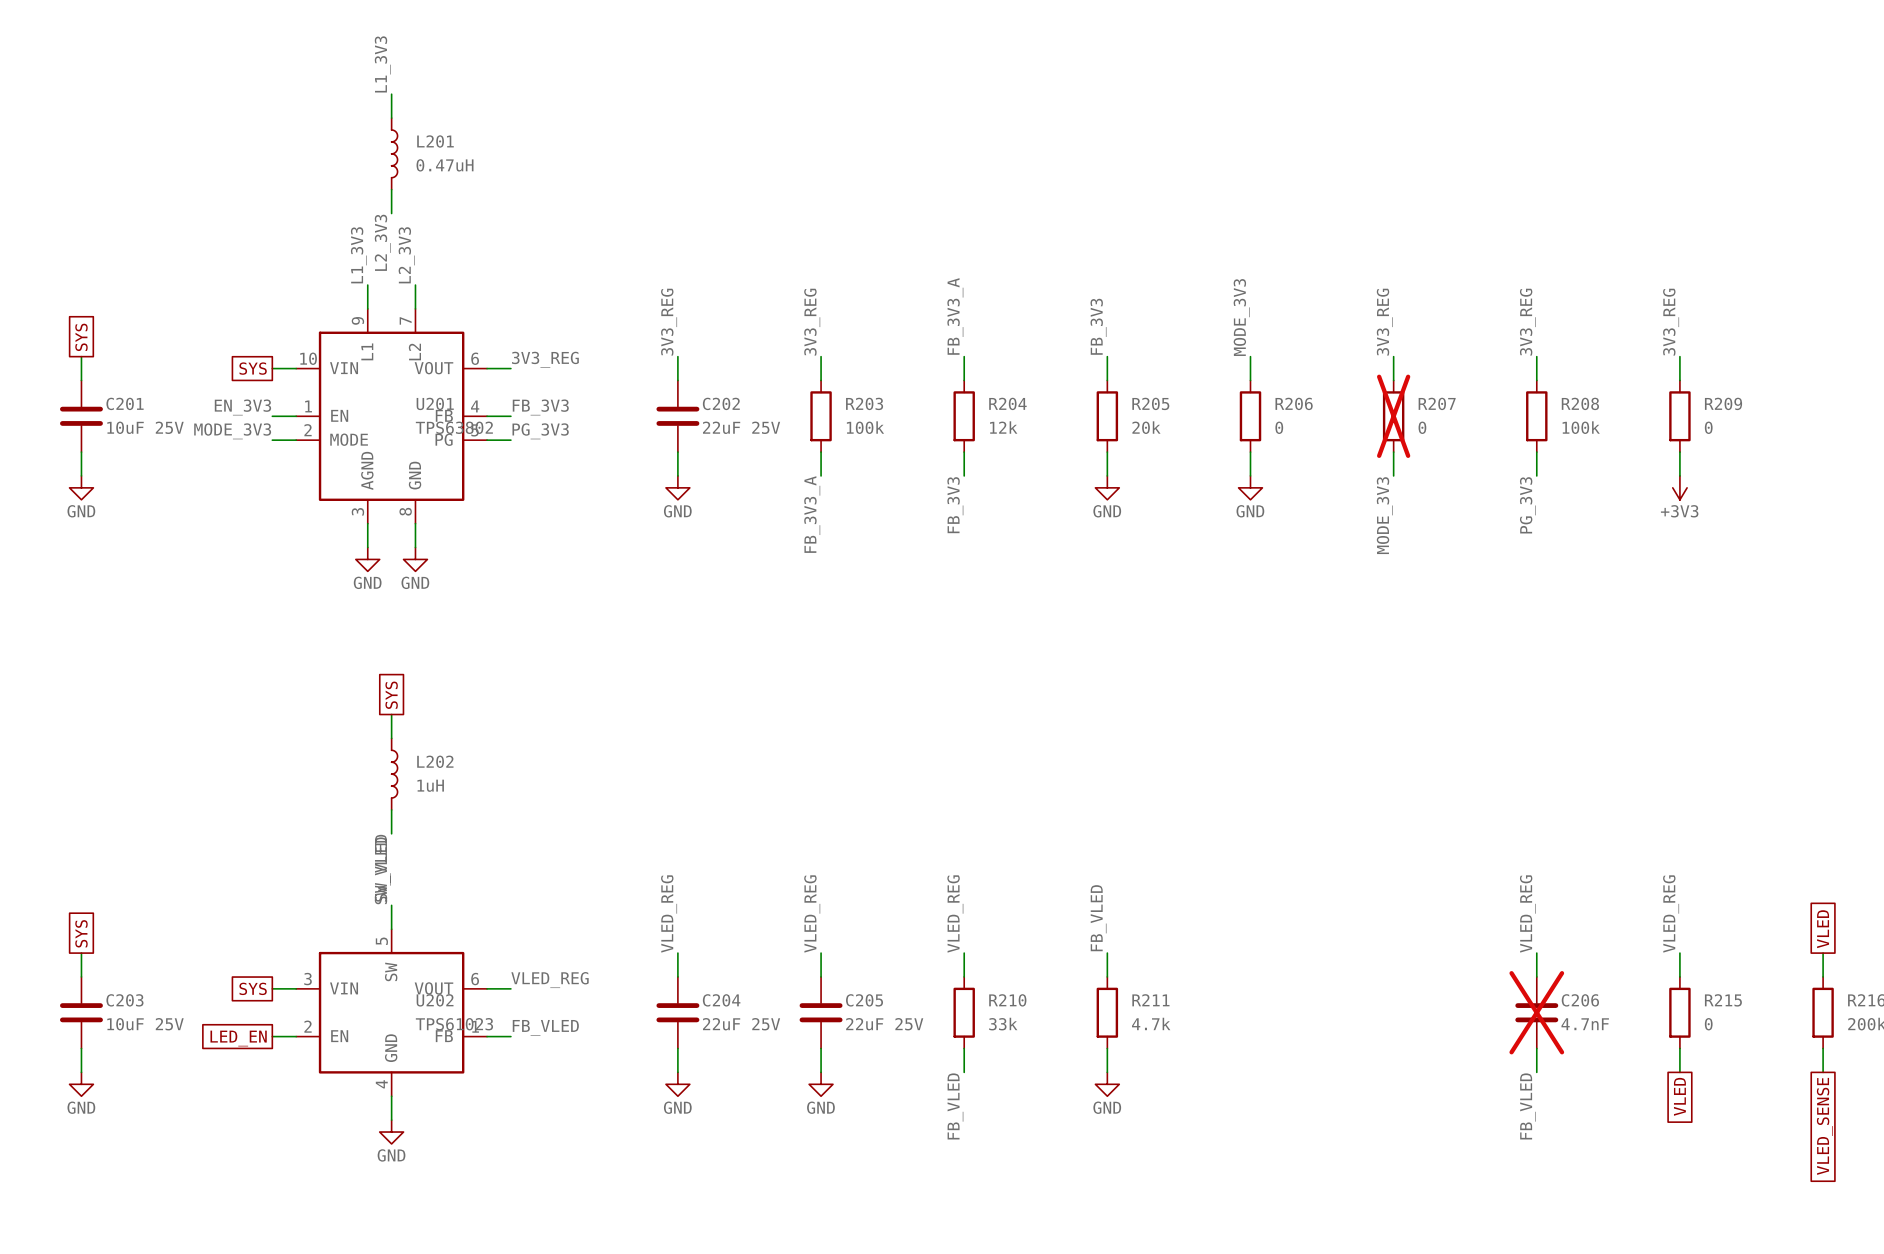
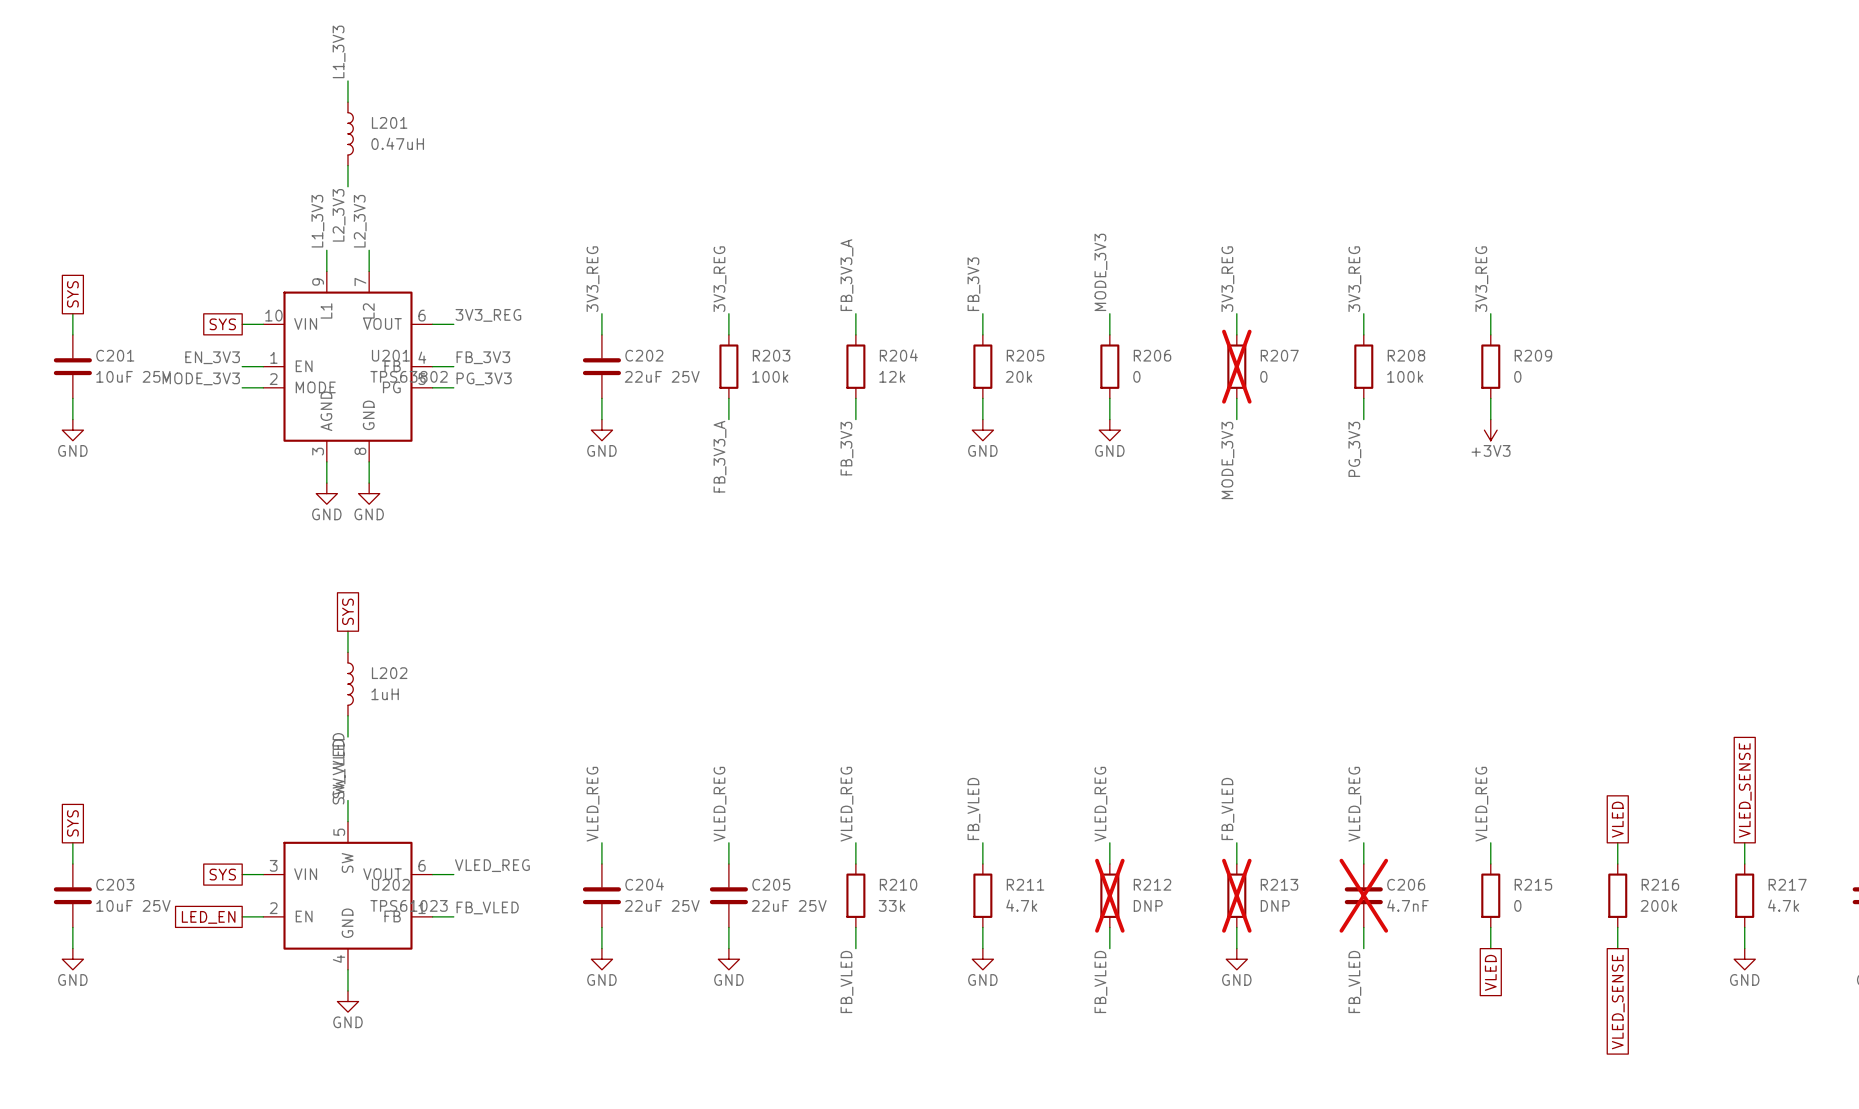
label: none -> VLED_REG (1100, 804)
label: none -> FB_VLED (1227, 808)
wire: none -> (1109, 842) (1109, 863)
wire: none -> (1236, 842) (1236, 863)
R212: none -> DNP (1109, 895)
R213: none -> DNP (1236, 895)
wire: none -> (1109, 927) (1109, 948)
wire: none -> (1236, 927) (1236, 948)
power symbol: none -> GND (1236, 959)
label: none -> FB_VLED (1100, 981)

